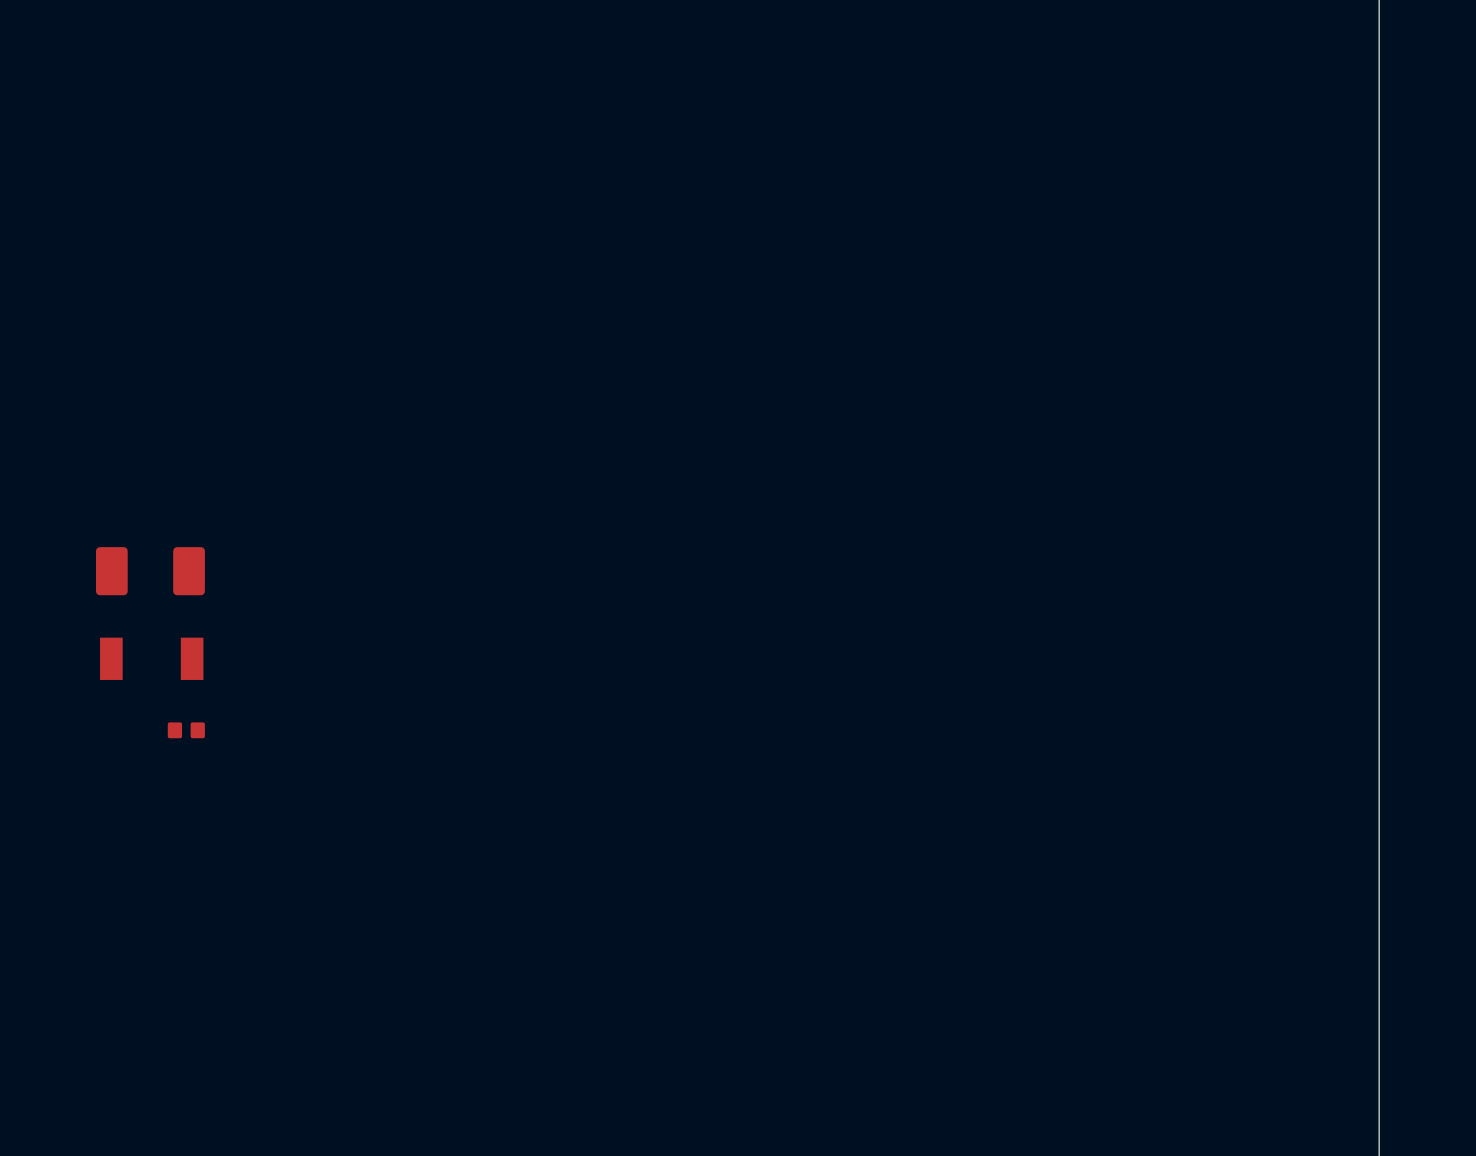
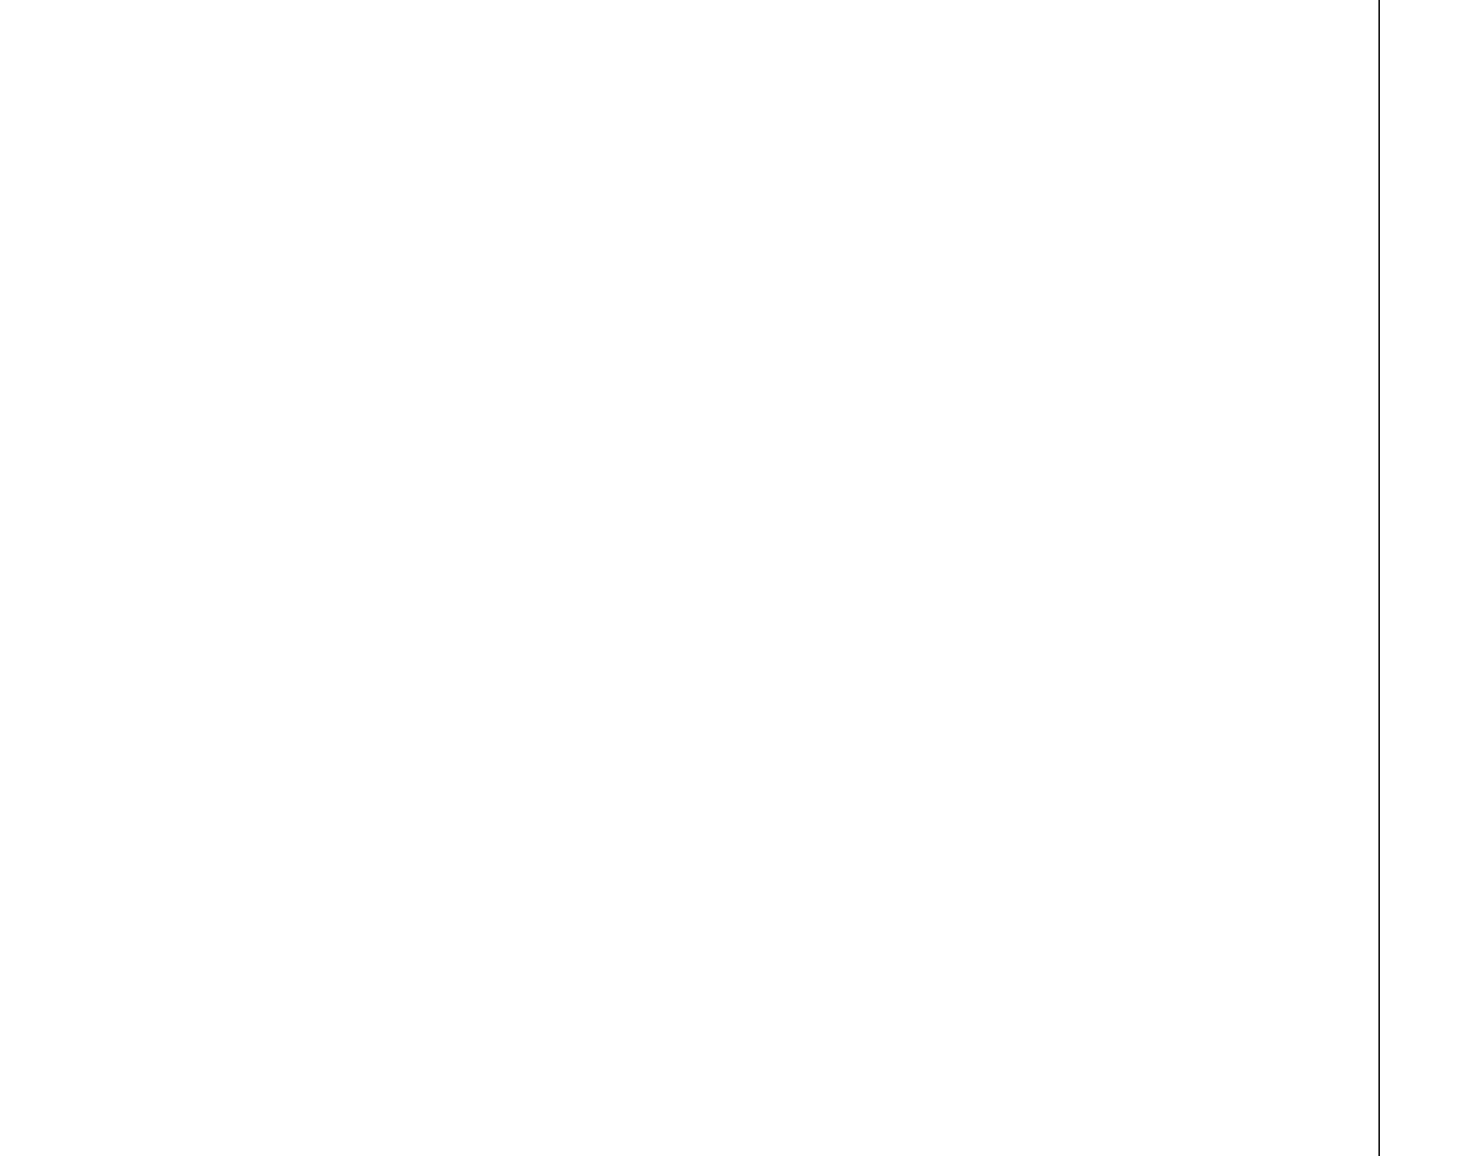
part: (150, 571) -> none
part: (151, 658) -> none
part: (186, 730) -> none

